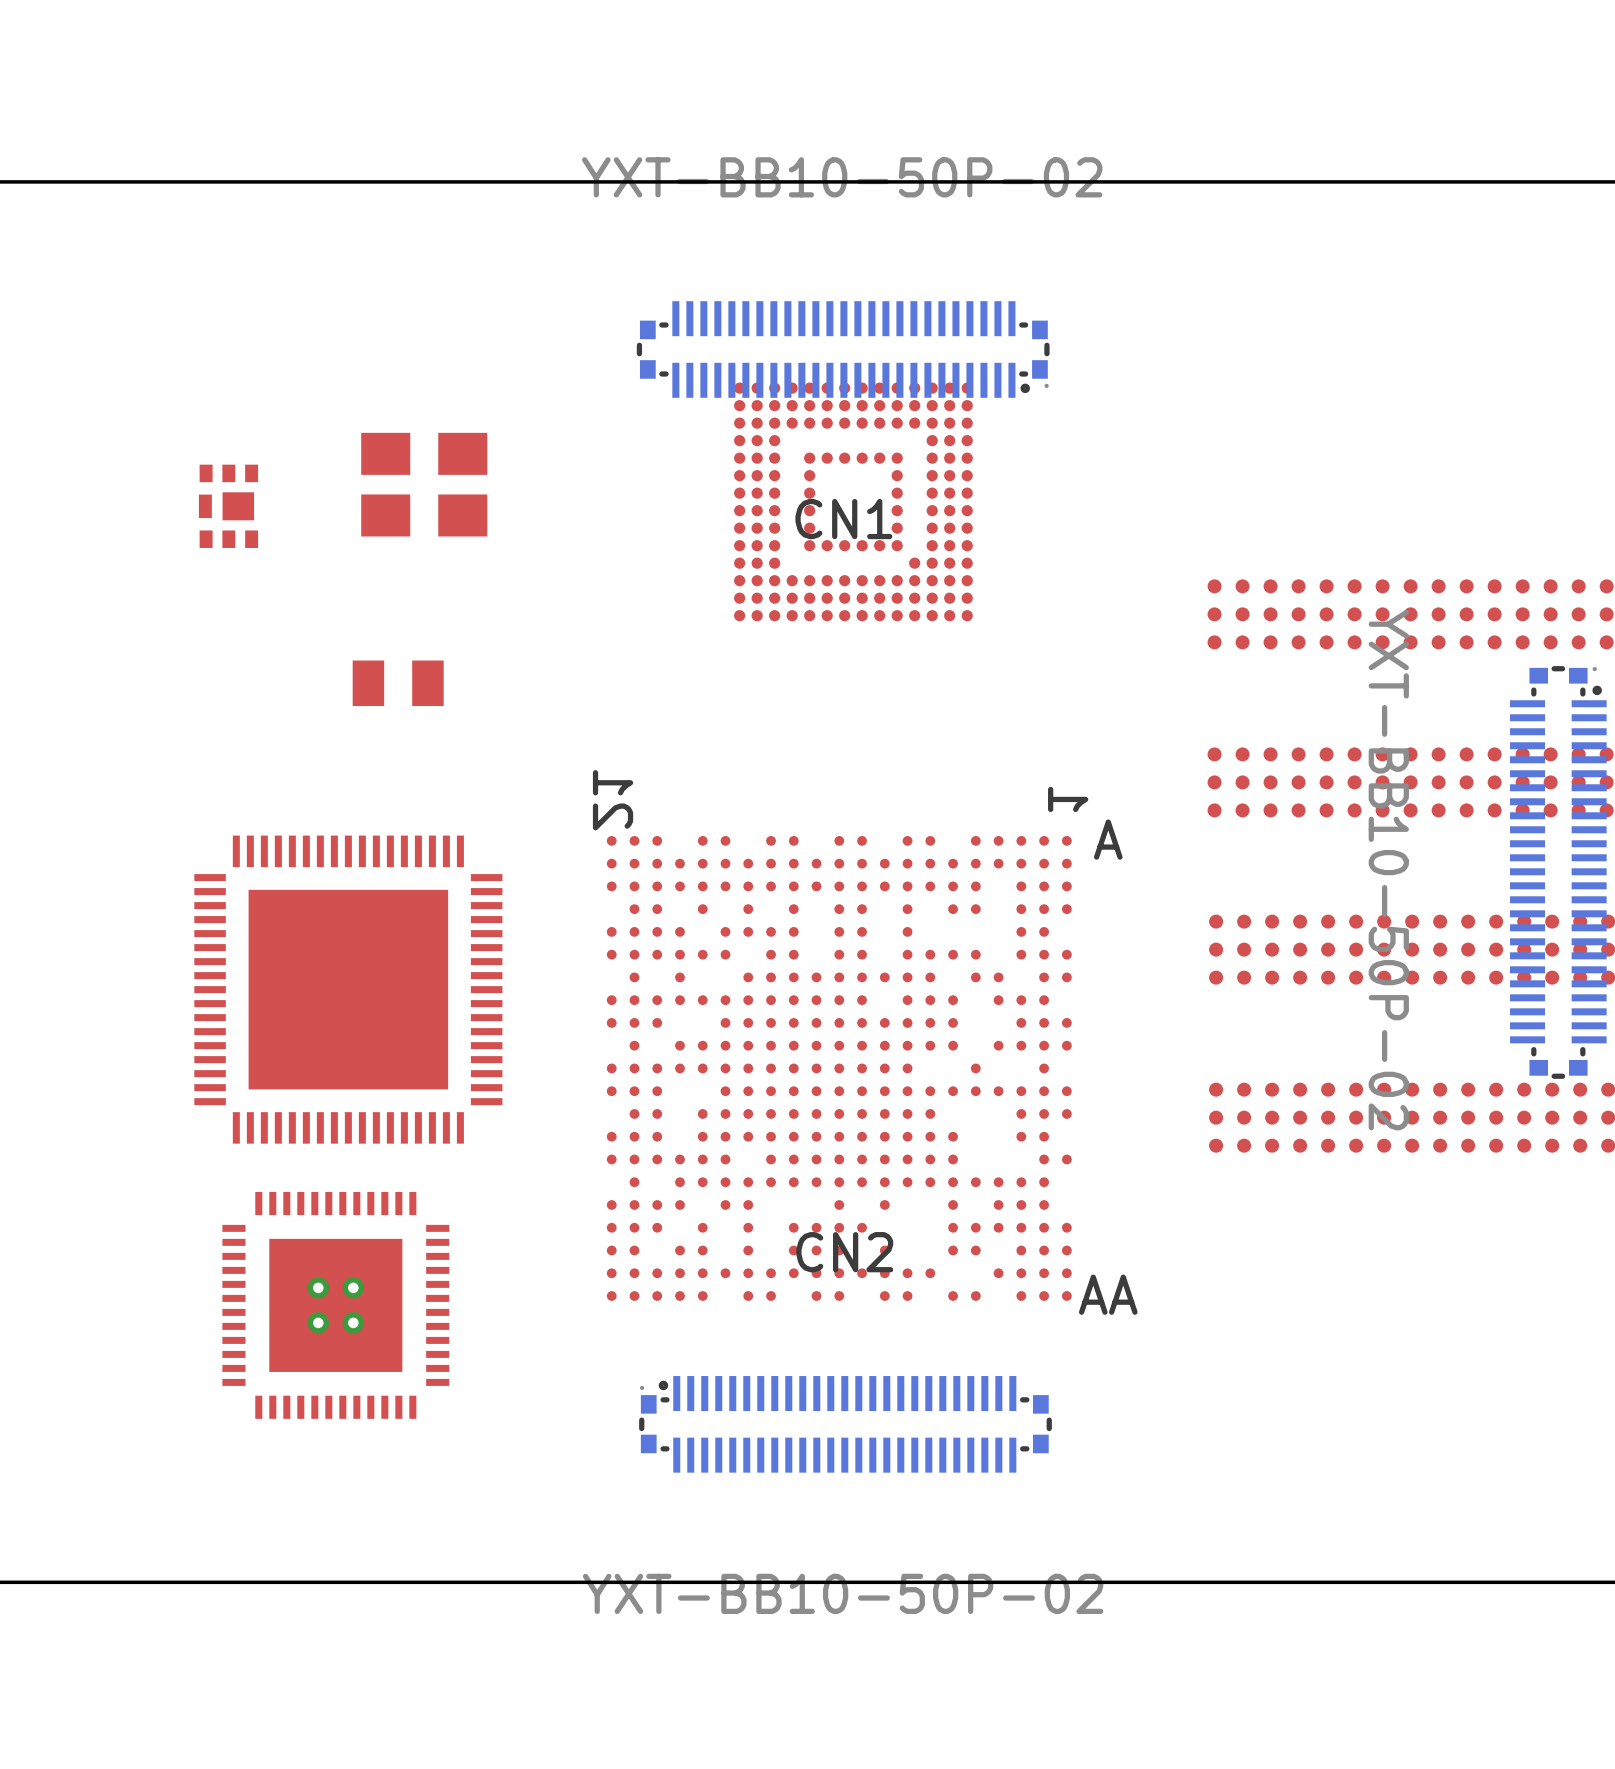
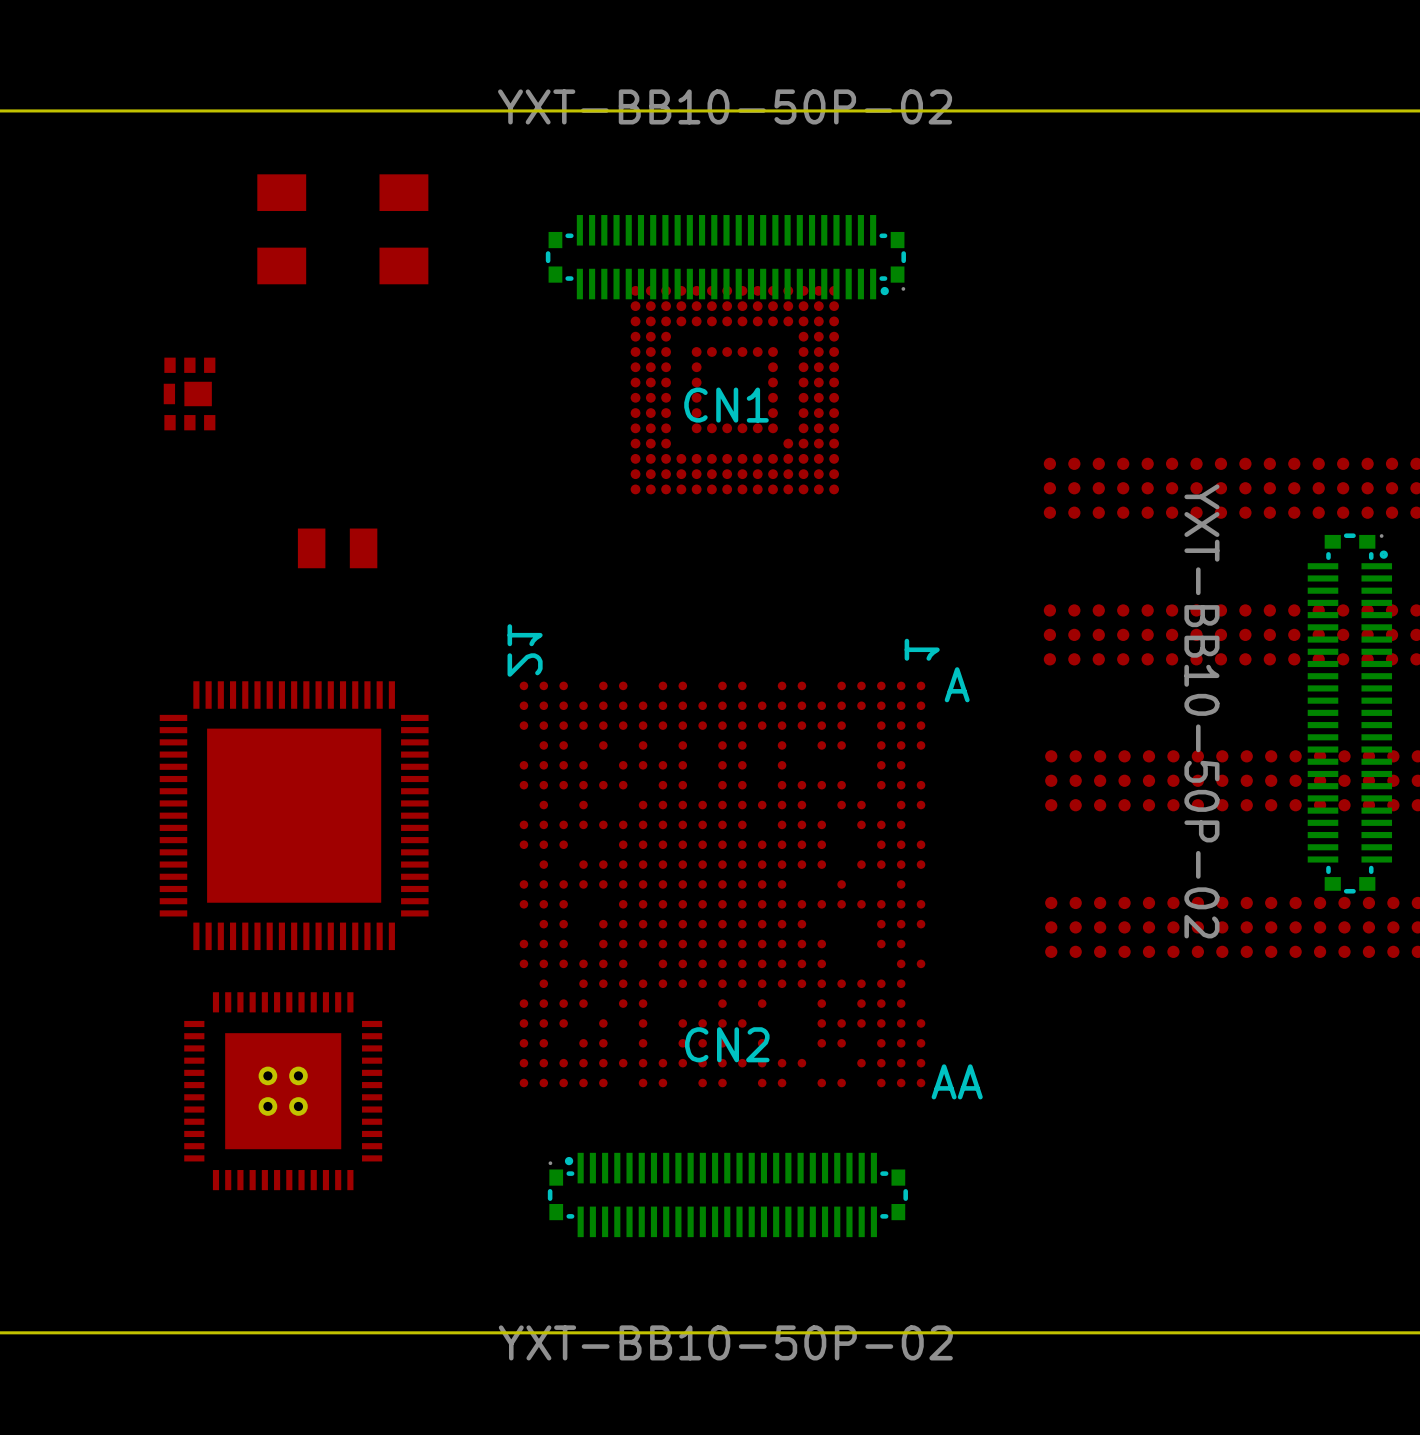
part: none -> (342, 229)
part: (424, 484) -> none

